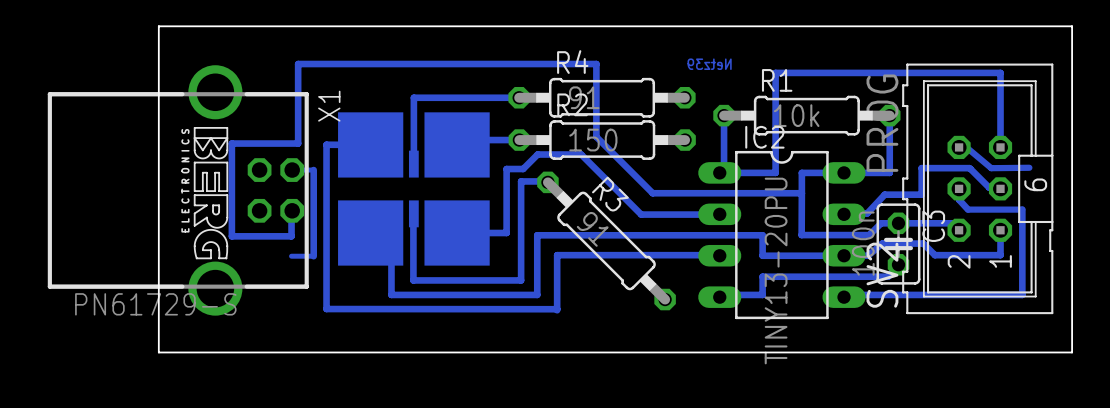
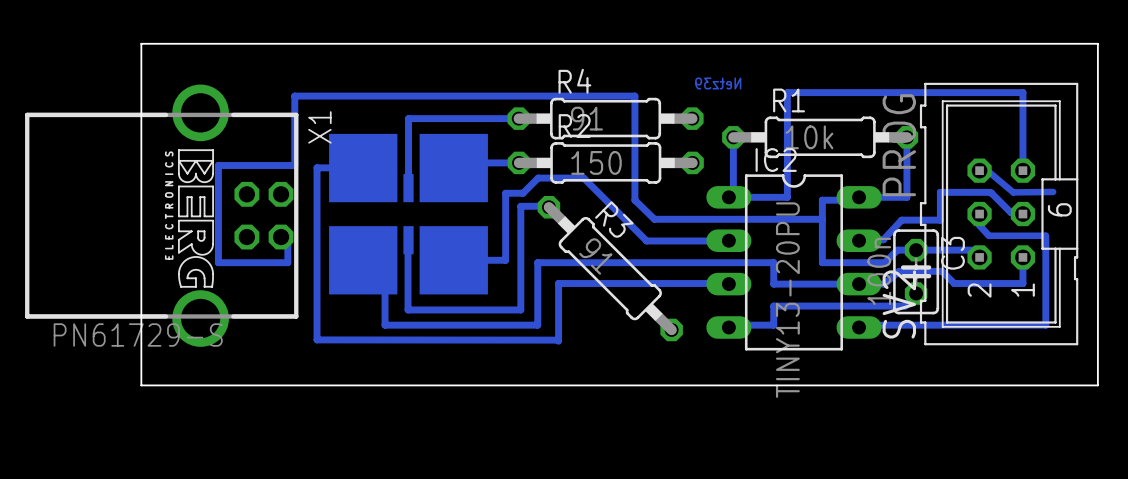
bottom track: (292, 170) (313, 170) (313, 256) (291, 256) -> none
bottom track: (844, 172) (801, 172) (801, 193) -> none
bottom track: (801, 193) (801, 235) (869, 235) (881, 223) (959, 223) -> (859, 197) (859, 200) (822, 200) (822, 262) (884, 262) (897, 250) (979, 250)
bottom track: (801, 193) (652, 193) (596, 136) (596, 64) (298, 64) (298, 143) (231, 143) (231, 236) (291, 236) (292, 210) -> none
bottom track: none -> (822, 219) (654, 219) (634, 200) (634, 96) (294, 96) (294, 165) (218, 165) (218, 262) (287, 262) (287, 237) (283, 237)

